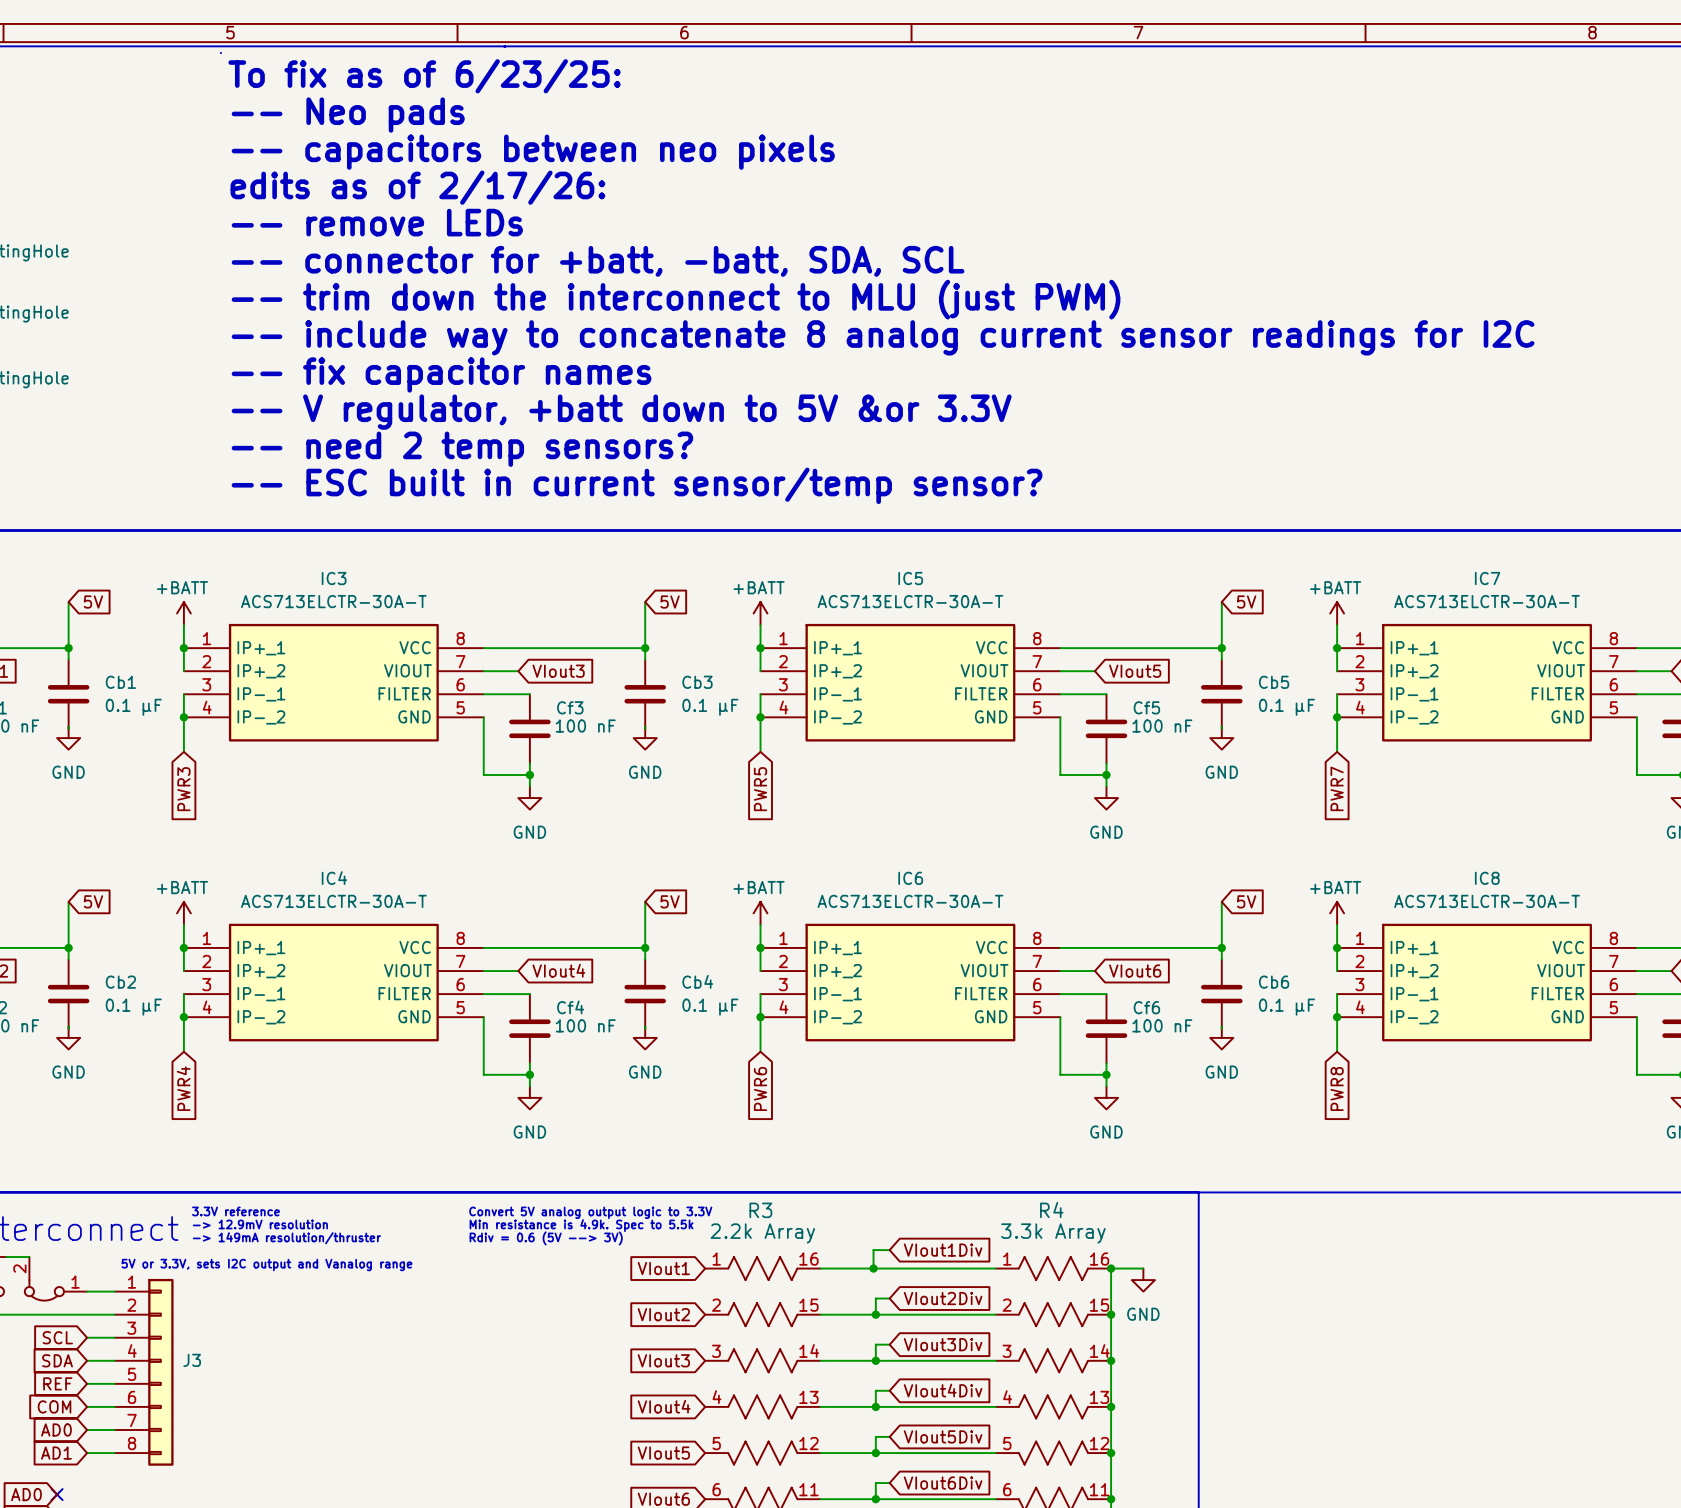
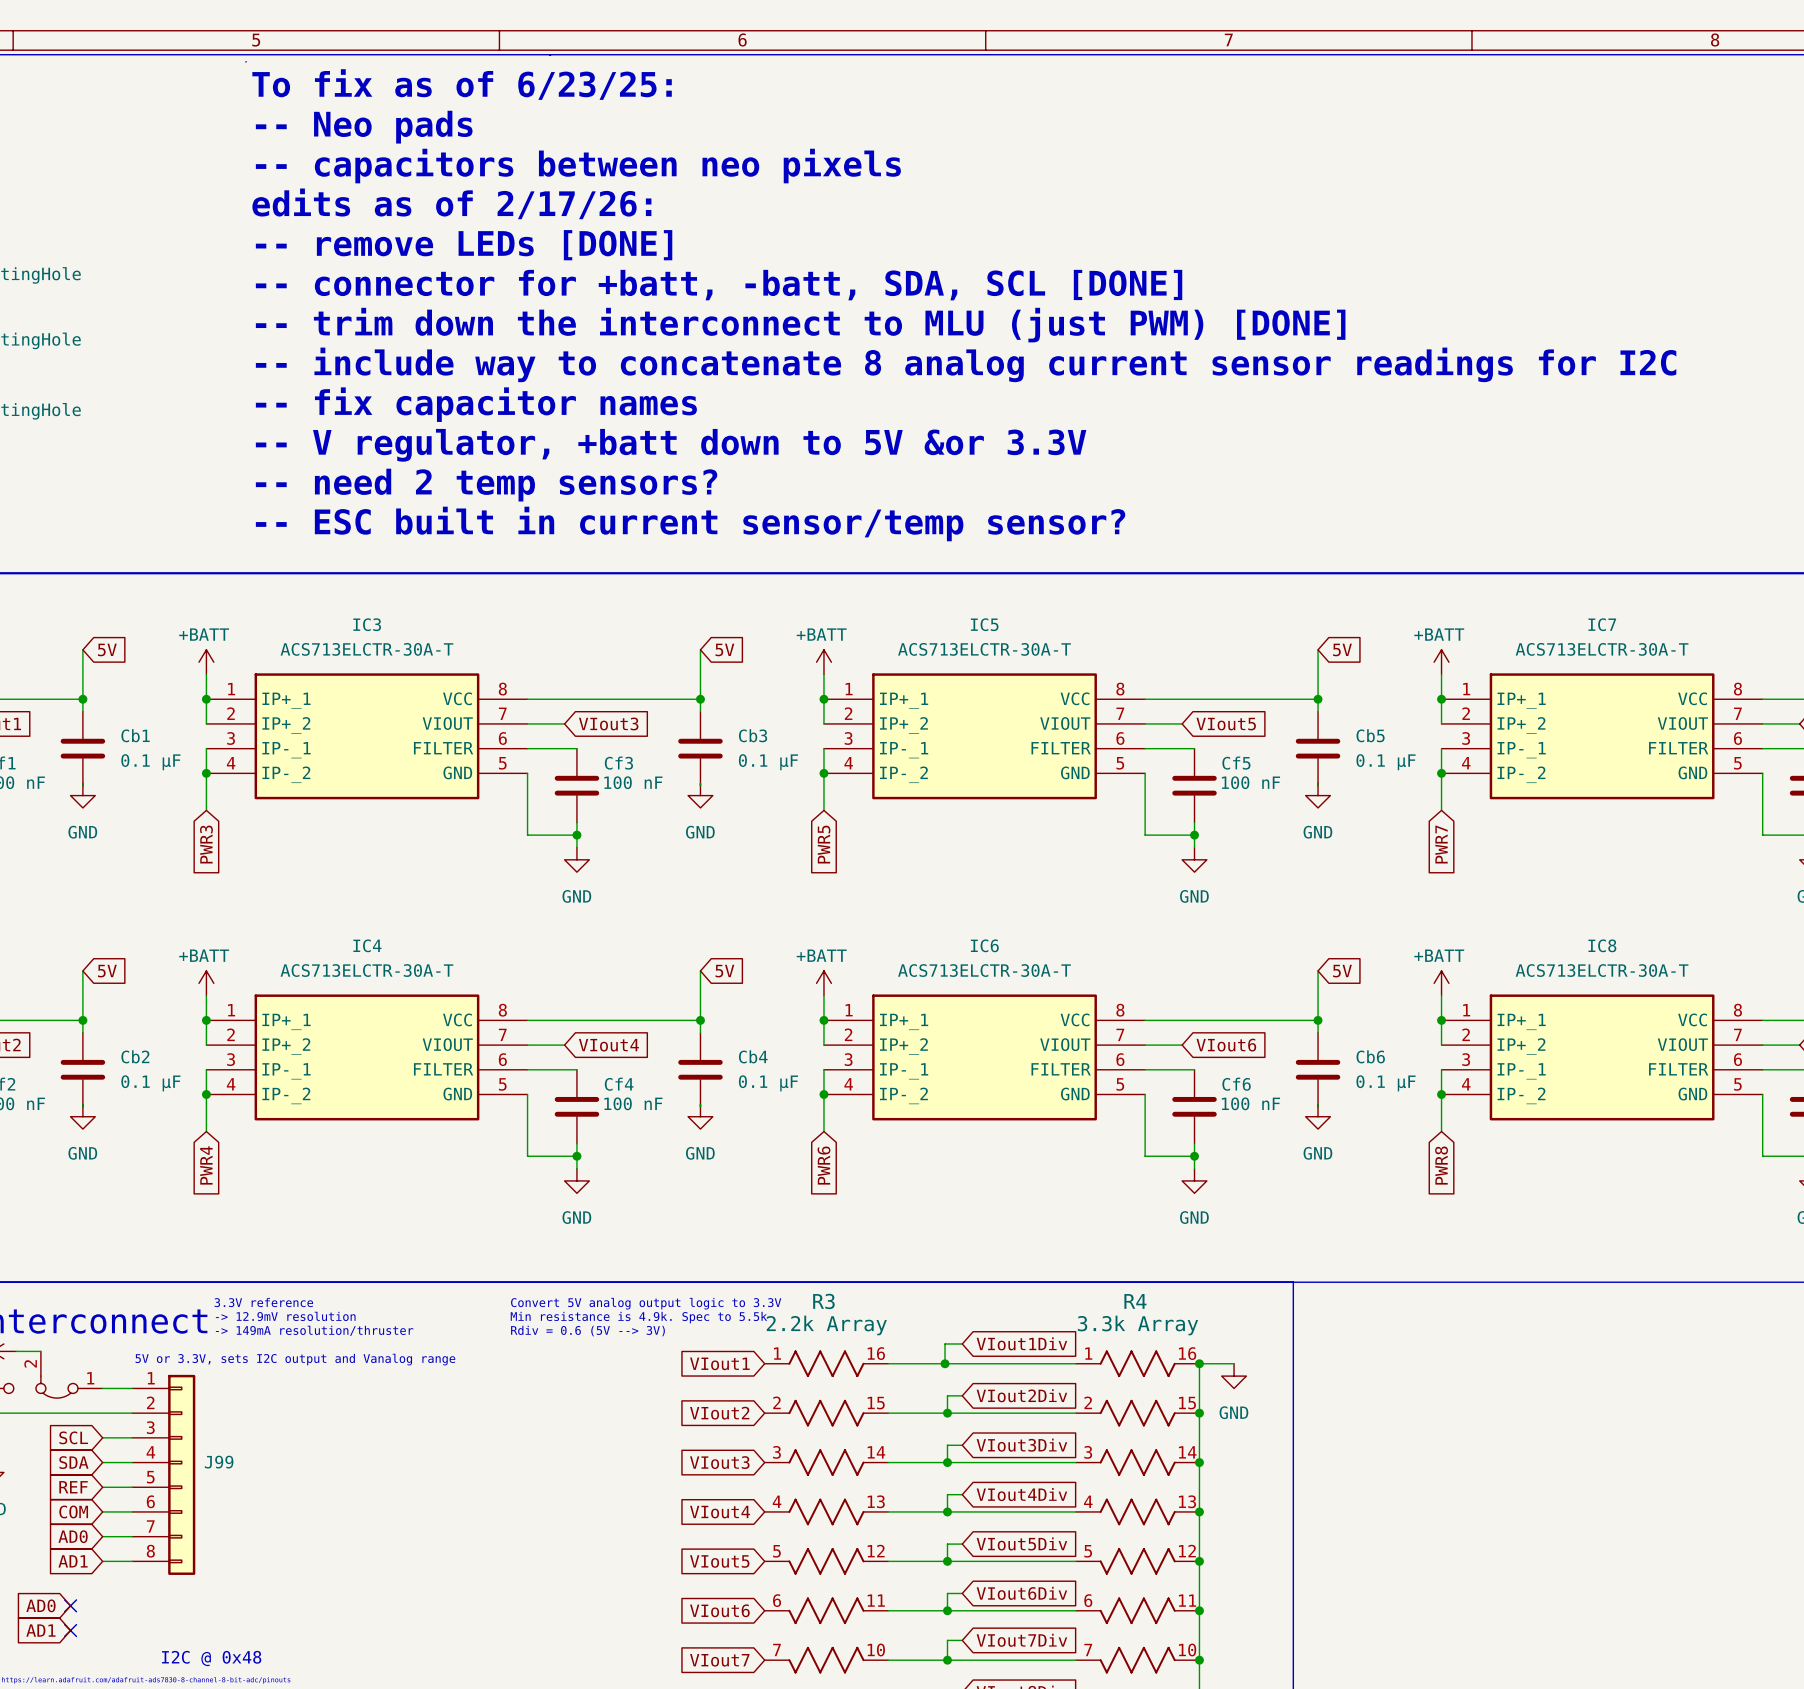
text: -- remove LEDs (377, 222) -> -- remove LEDs [DONE] (464, 245)
text: -- connector for +batt, -batt, SDA, SCL (598, 261) -> -- connector for +batt, -batt, SDA, SCL [DONE] (719, 285)
text: -- trim down the interconnect to MLU (just PWM) (676, 299) -> -- trim down the interconnect to MLU (just PWM) [DONE] (800, 325)
J3 name: J3 (192, 1360) -> J99 (219, 1462)

